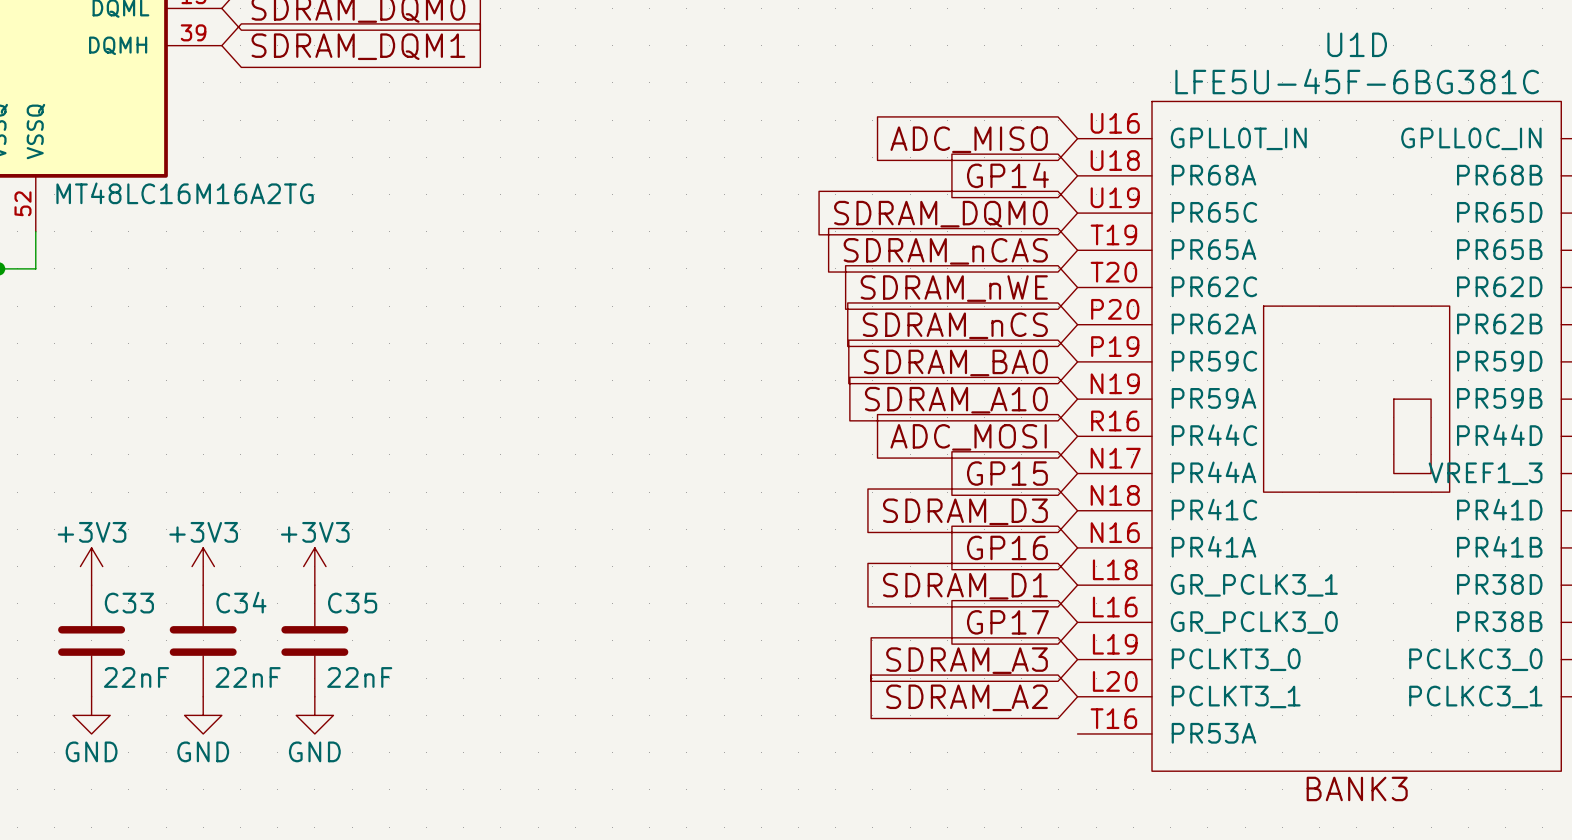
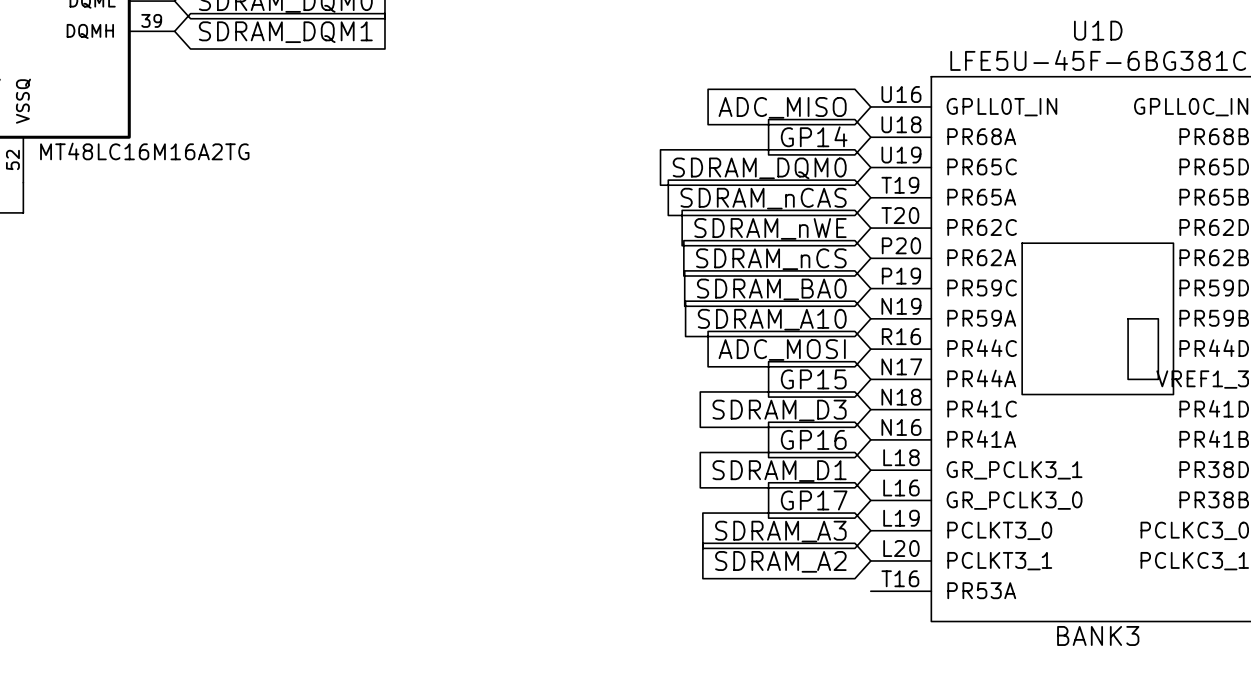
power symbol: +3V3 (91, 566) -> none
power symbol: +3V3 (203, 566) -> none
power symbol: +3V3 (314, 566) -> none
C33: 22nF (91, 640) -> none
C34: 22nF (203, 640) -> none
C35: 22nF (314, 640) -> none
power symbol: GND (91, 715) -> none
power symbol: GND (203, 715) -> none
power symbol: GND (314, 715) -> none

